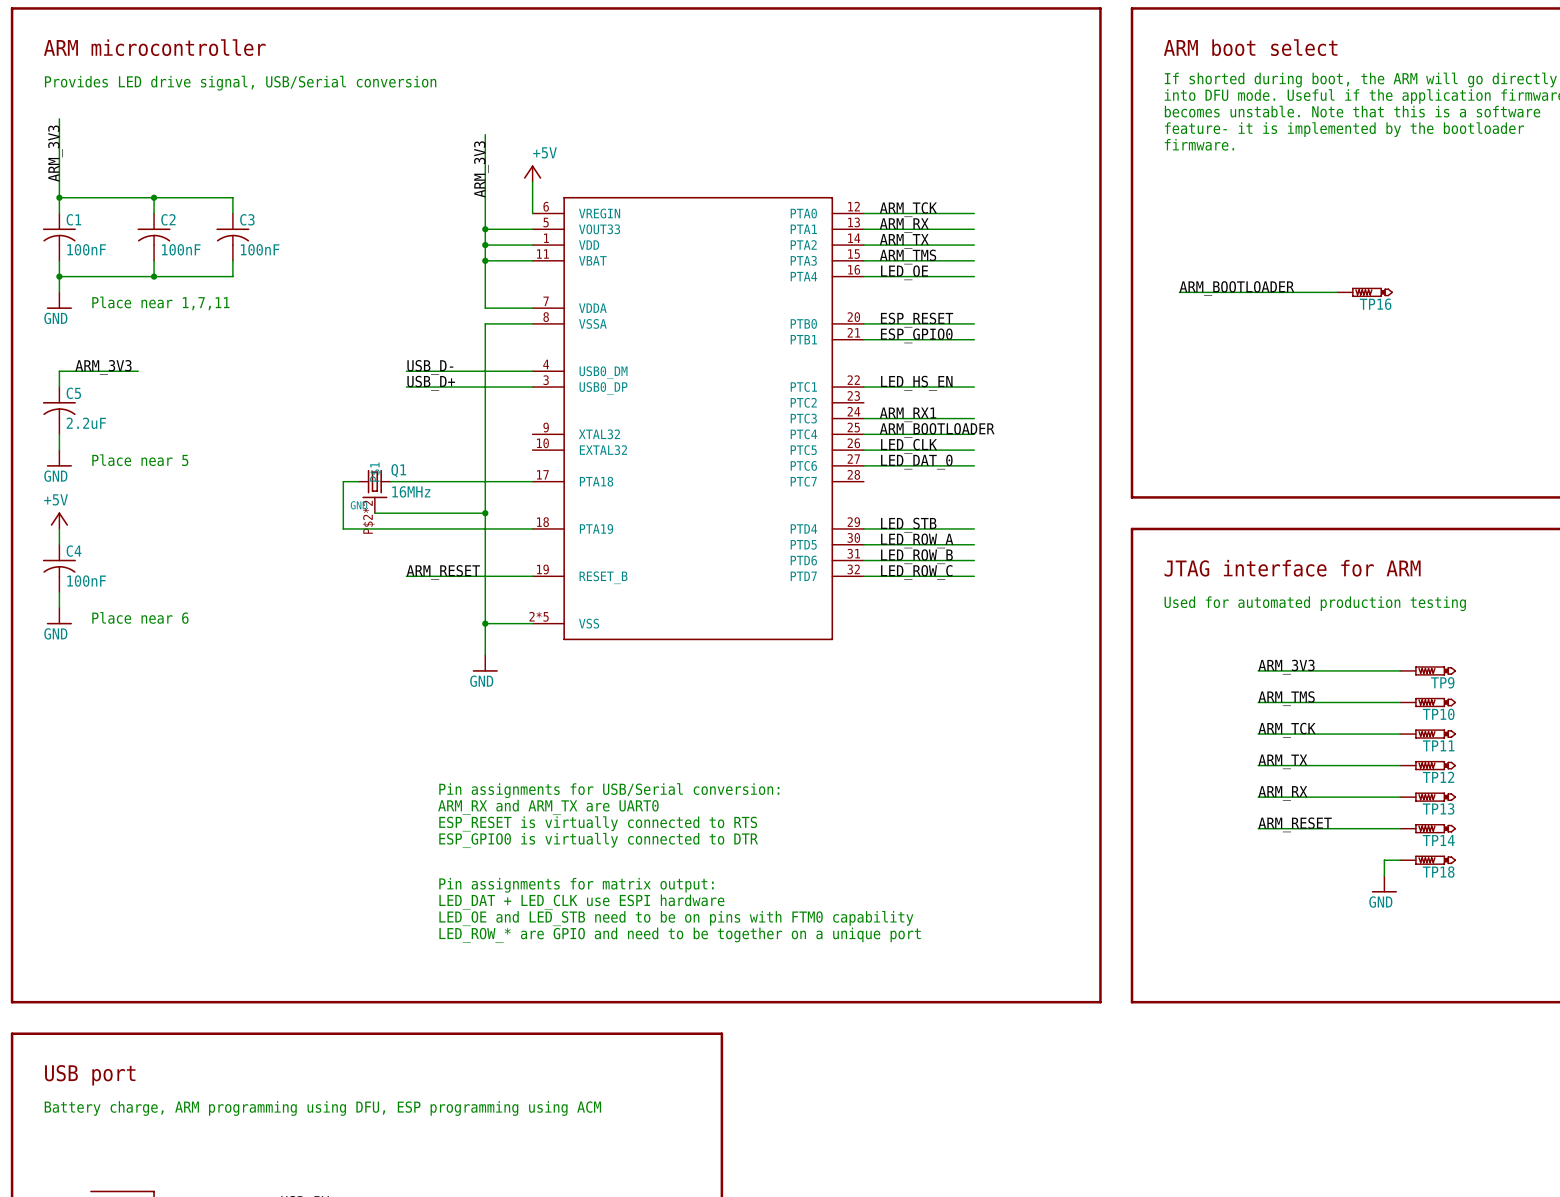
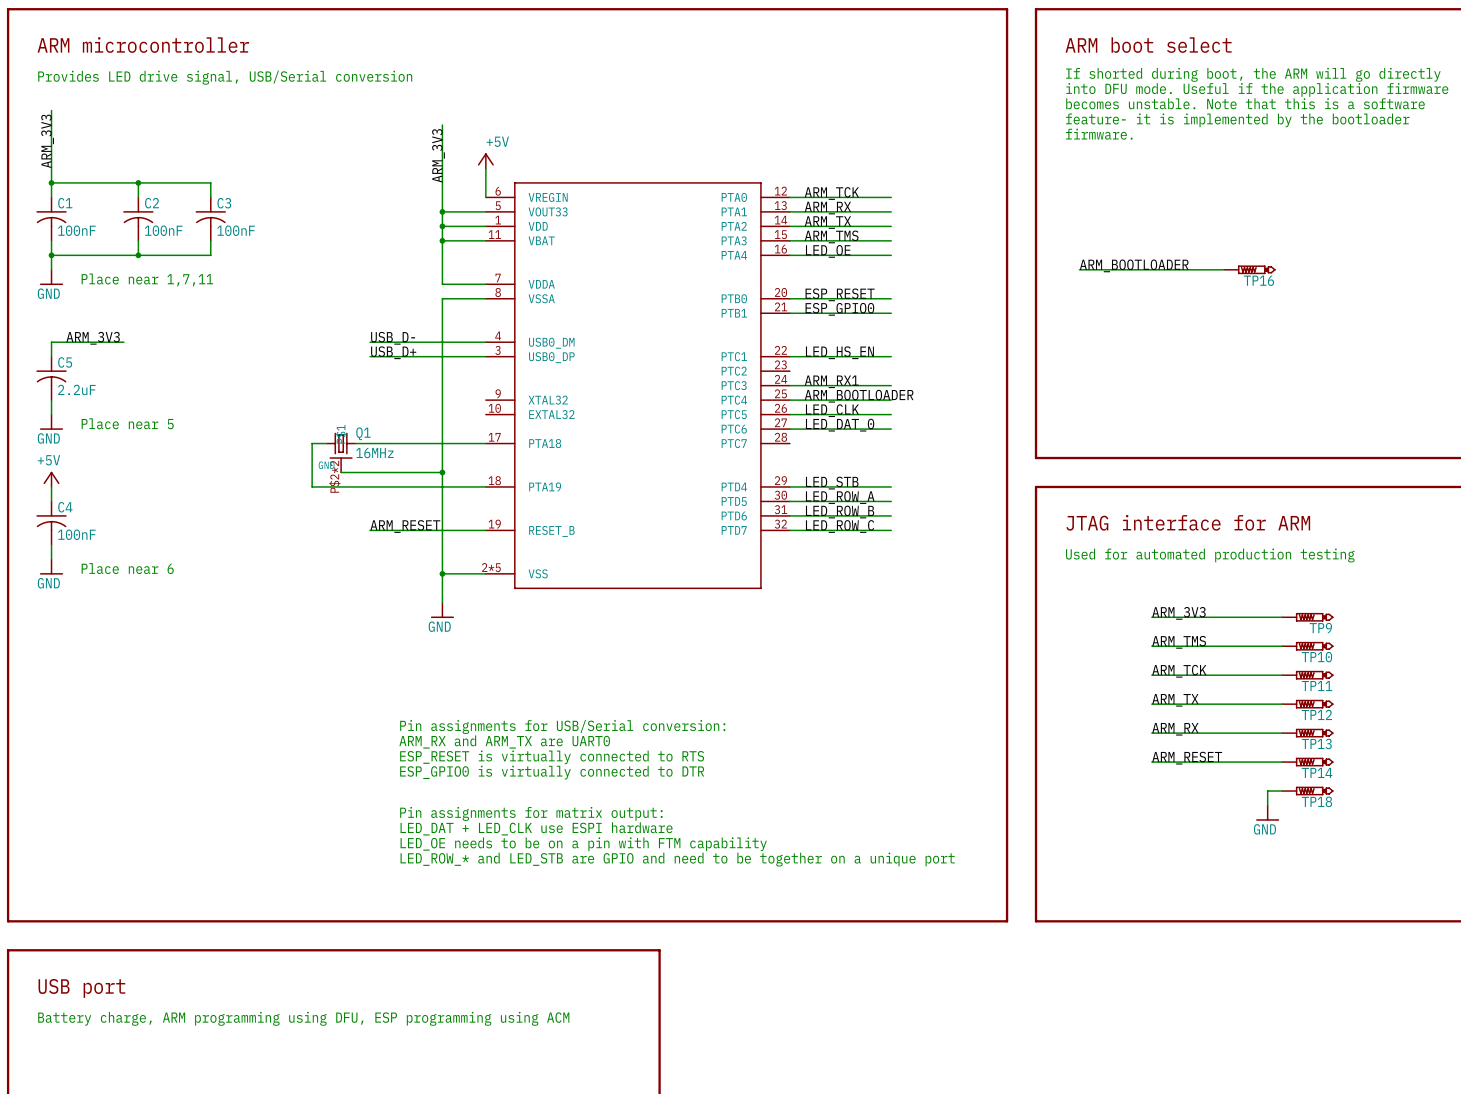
text: LED_OE and LED_STB need to be on pins with FTM0 capability (676, 918) -> LED_OE needs to be on a pin with FTM capability (583, 844)
text: LED_ROW_* are GPIO and need to be together on a unique port (680, 935) -> LED_ROW_* and LED_STB are GPIO and need to be together on a unique port (677, 859)

